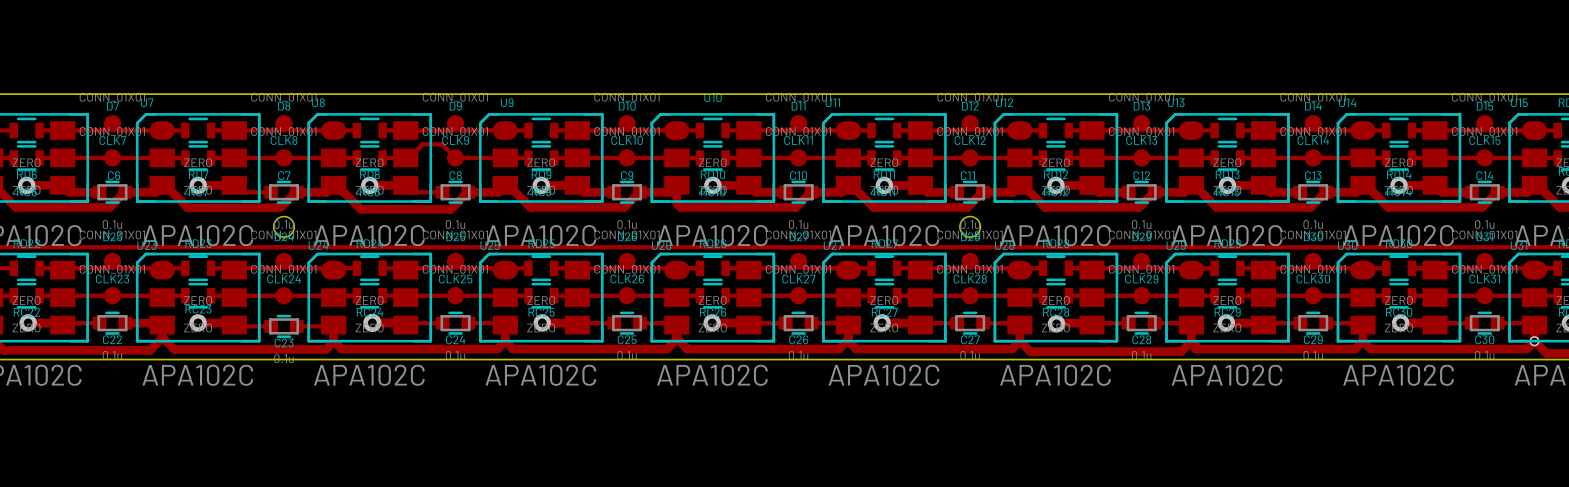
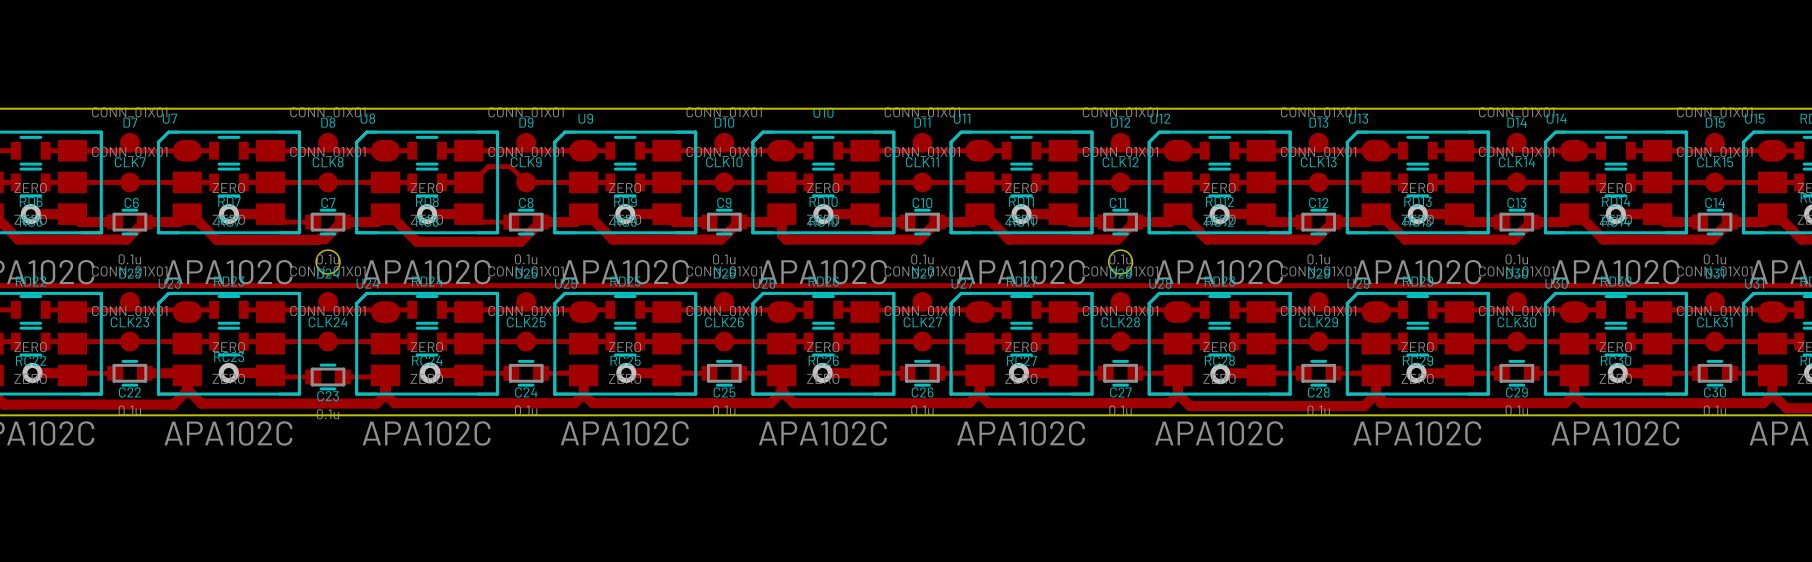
via: (1534, 341) -> none

